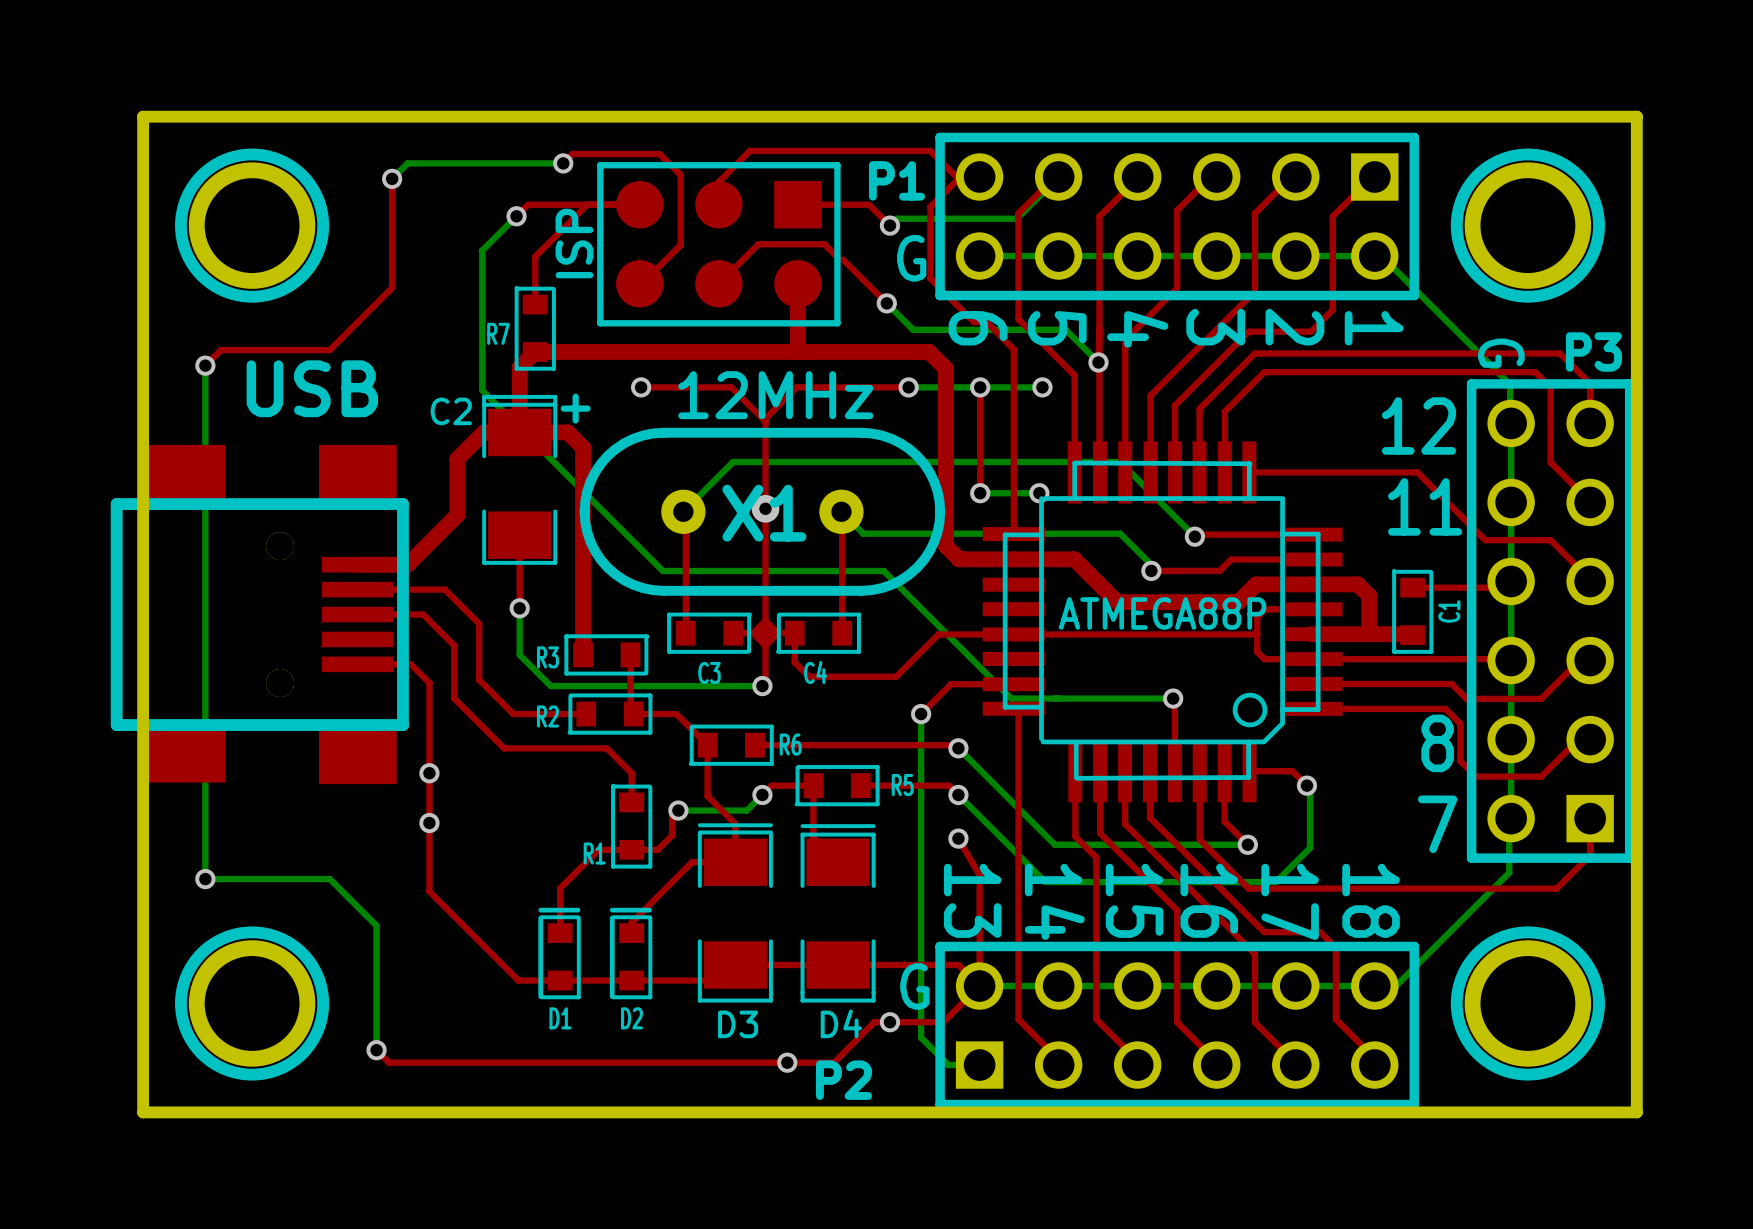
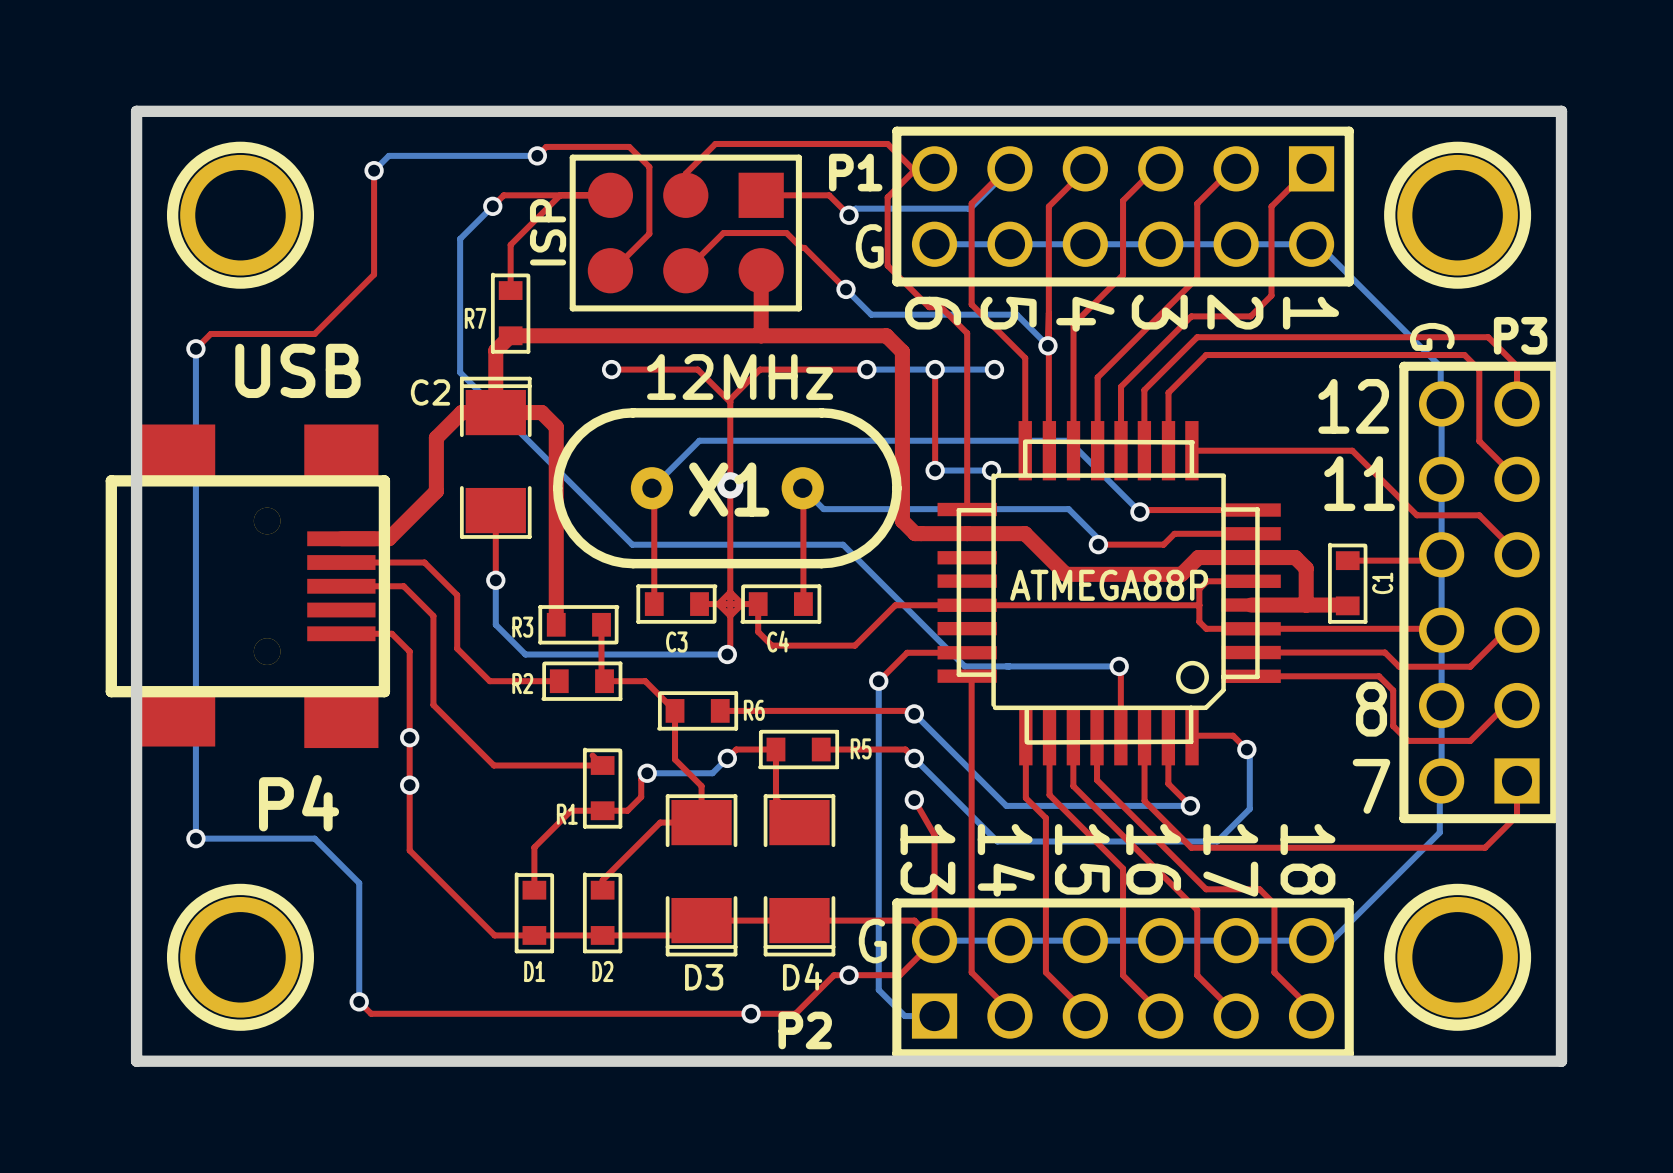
text: + (575, 408) -> none
top track: (454, 698) (504, 748) (606, 748) (631, 773) (631, 802) -> (433, 666) (433, 705) (493, 765) (602, 765) (592, 755)
D3 footprint: [697, 823, 773, 1003] -> [665, 794, 738, 957]
D4 footprint: [800, 824, 876, 1003] -> [763, 794, 836, 957]
P4 name: none -> P4 (299, 803)
D1 footprint: [538, 907, 581, 1000] -> [514, 872, 555, 954]
D2 footprint: [609, 907, 653, 1000] -> [582, 872, 623, 954]

